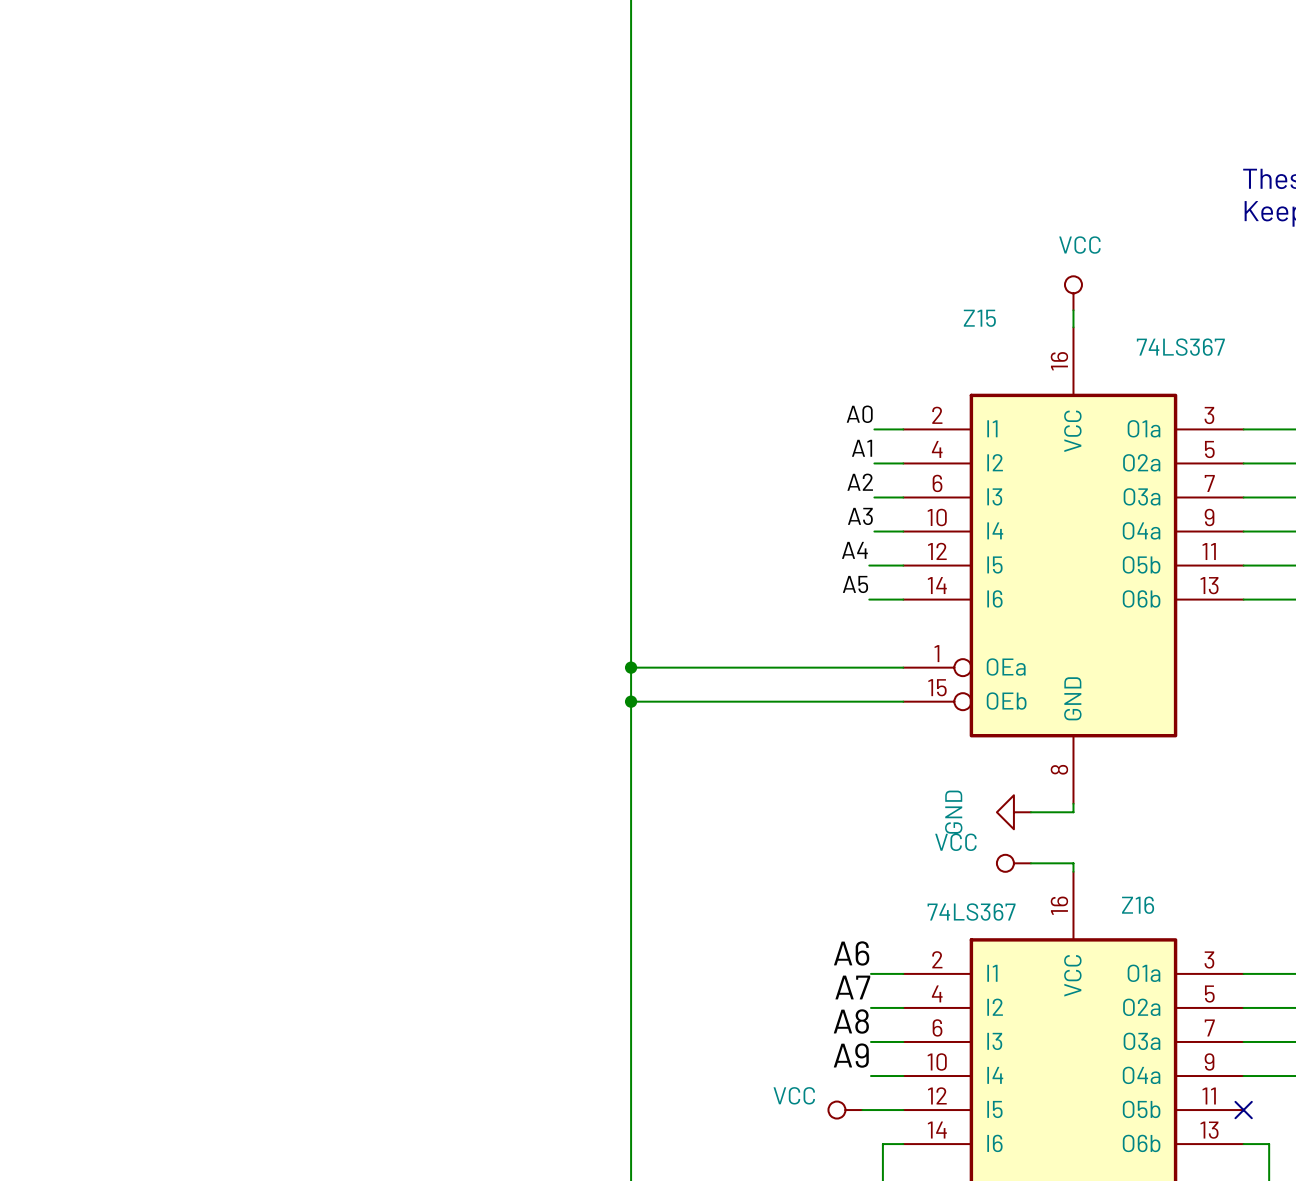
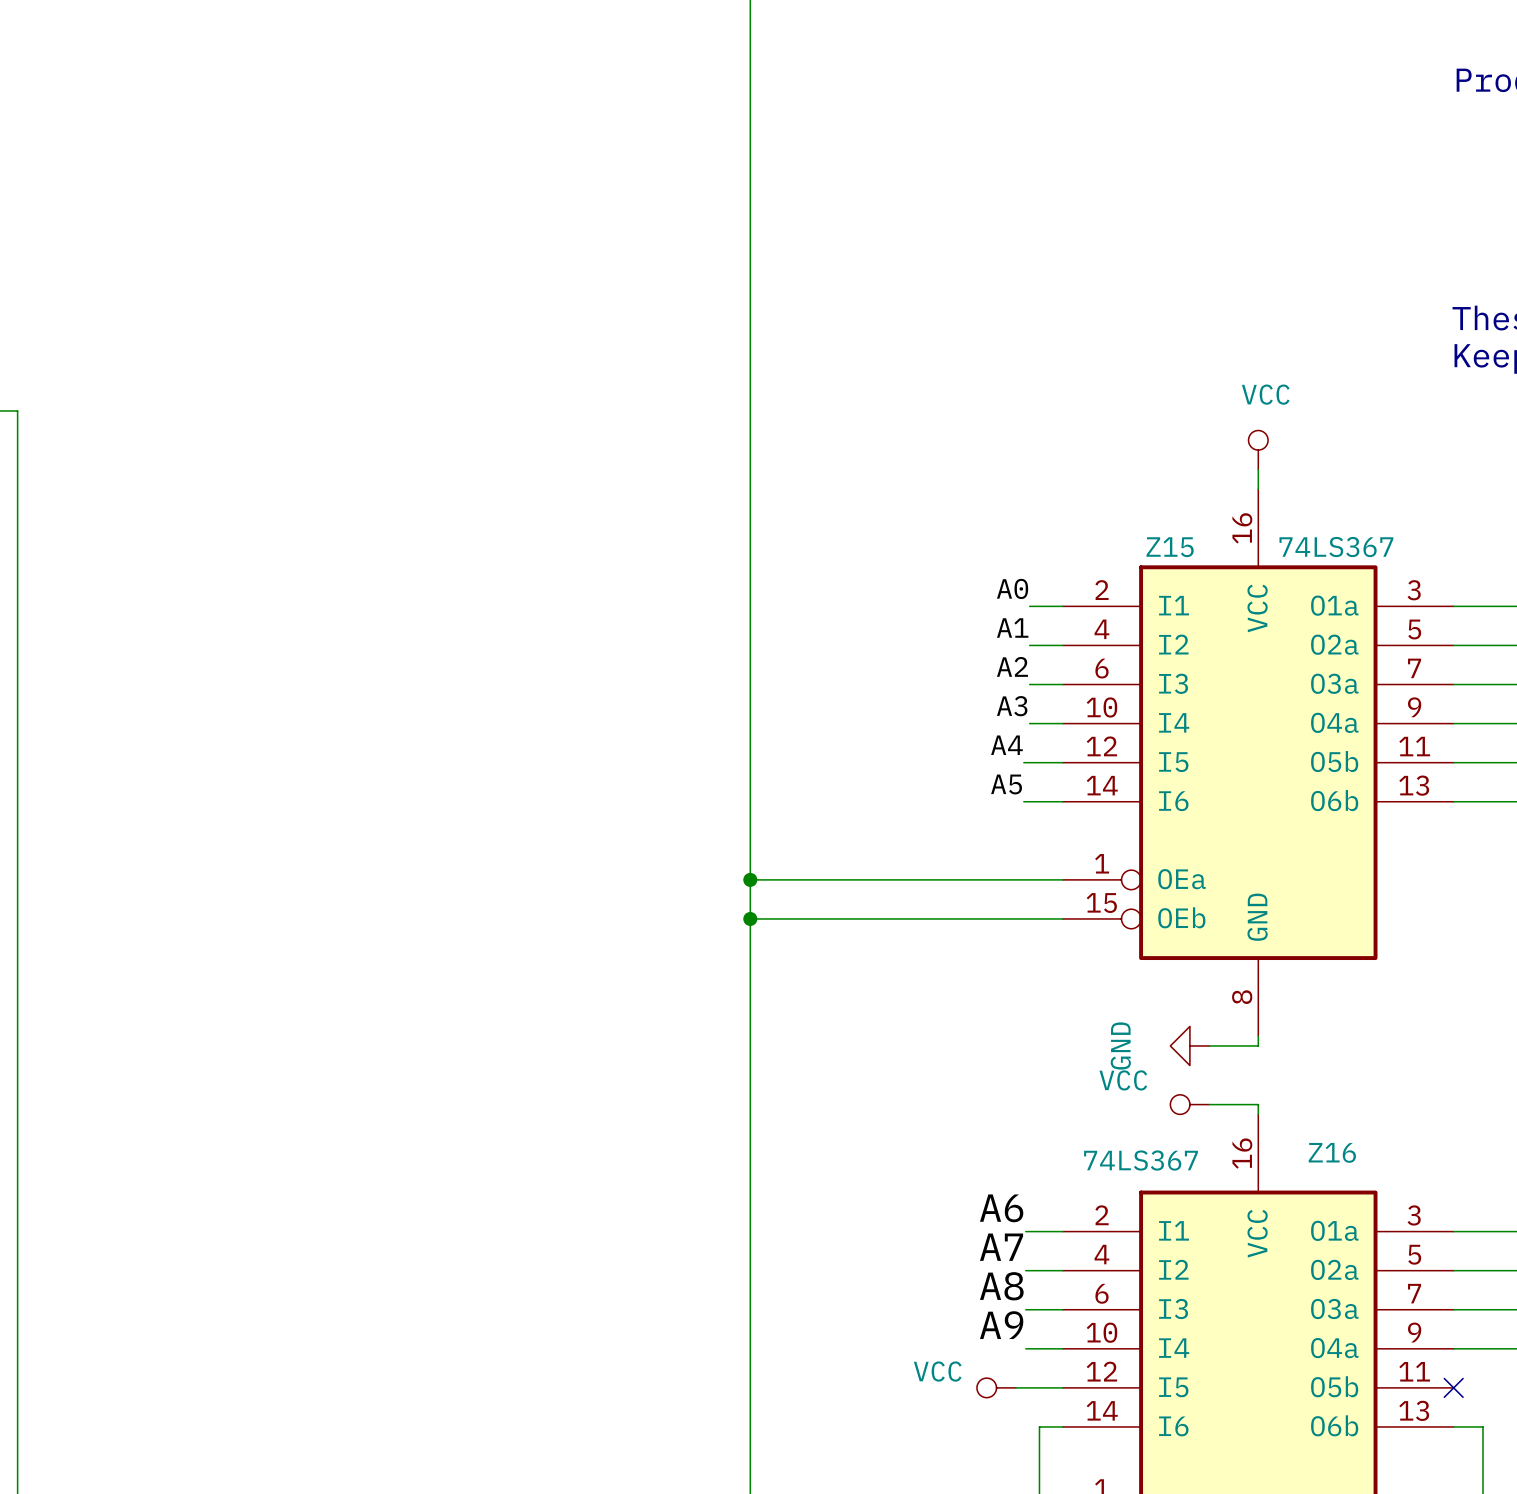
Z15 name position: Z15 (979, 318) -> Z15 (1170, 547)
Z15 value position: 74LS367 (1180, 347) -> 74LS367 (1336, 547)

